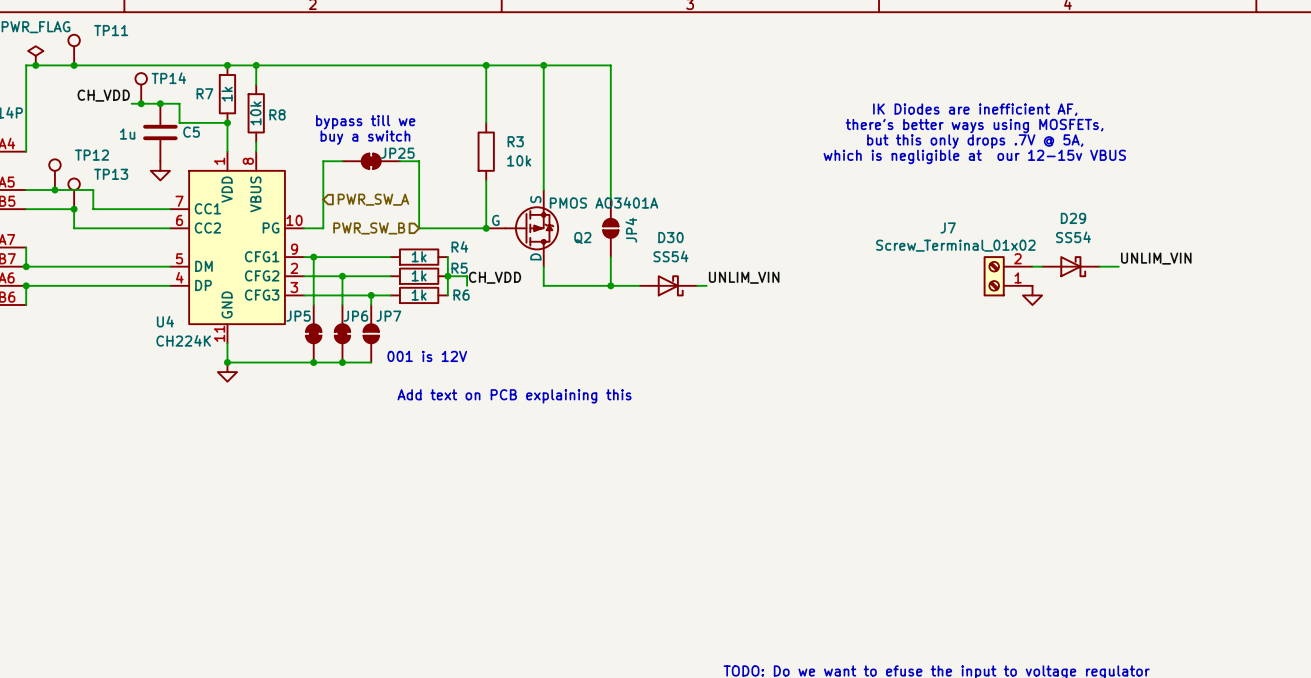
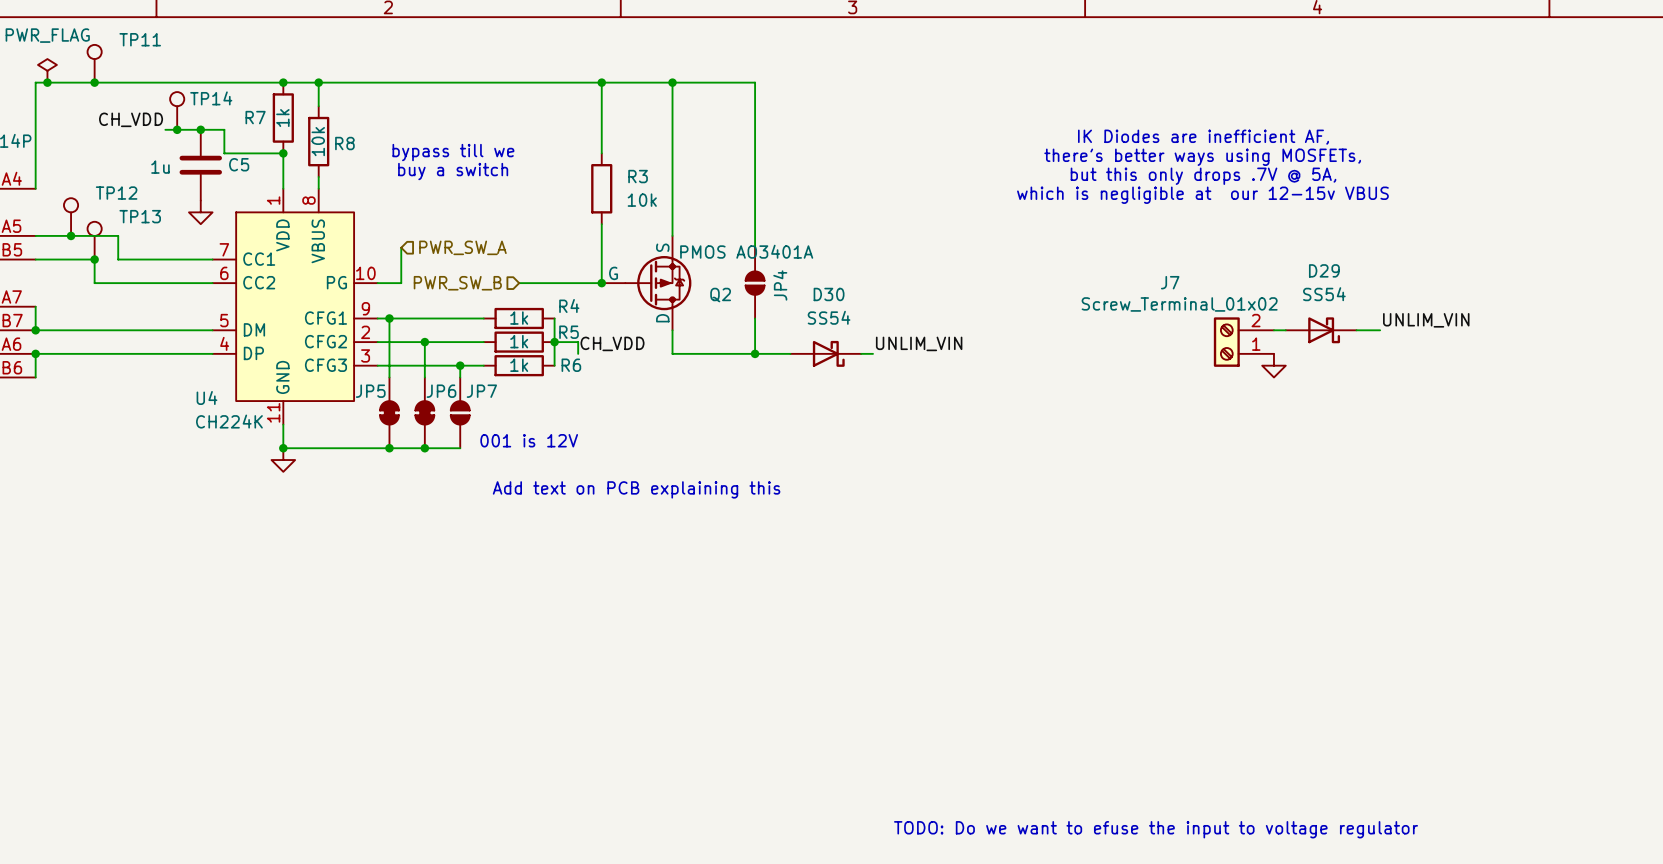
wire: (342, 161) (323, 161) (323, 199) -> none
JP25: (371, 161) -> none
wire: (399, 161) (419, 161) (419, 228) -> none

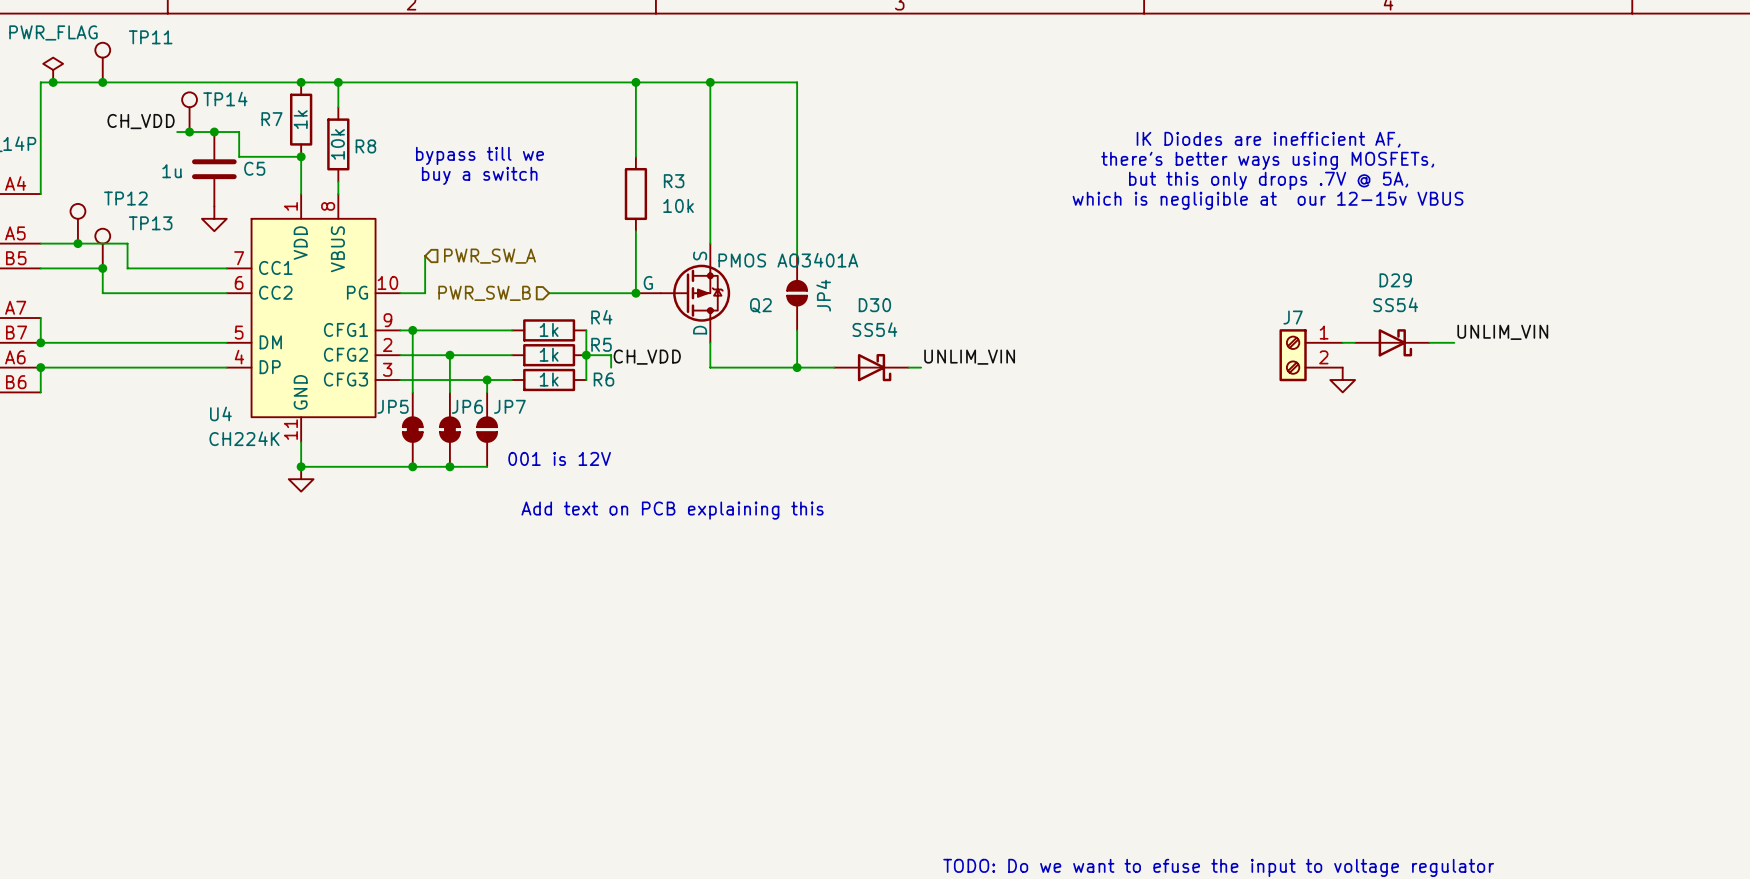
J7 name position: J7 (1170, 282) -> J7 (1293, 317)
J7 value: Screw_Terminal_01x02 (1179, 304) -> none
J7 flip: as is (1226, 342) -> up-down (1293, 355)

